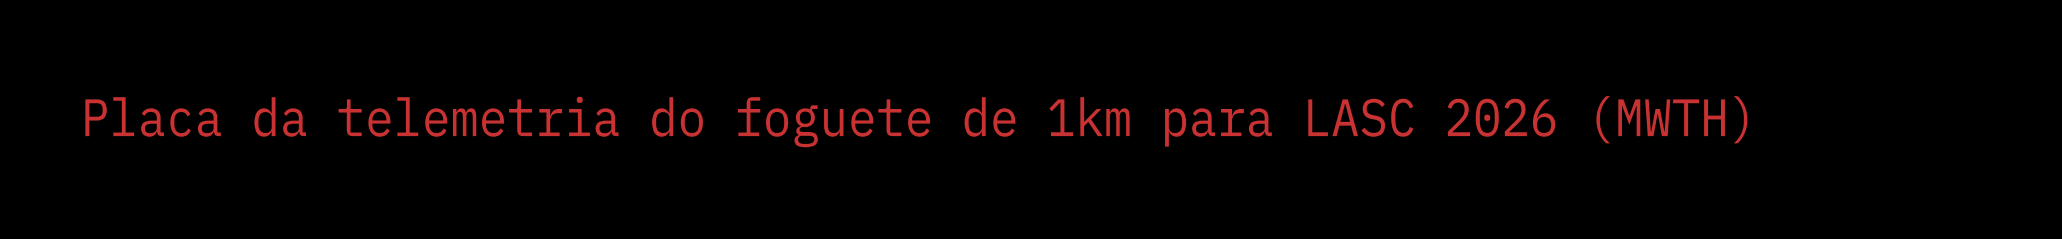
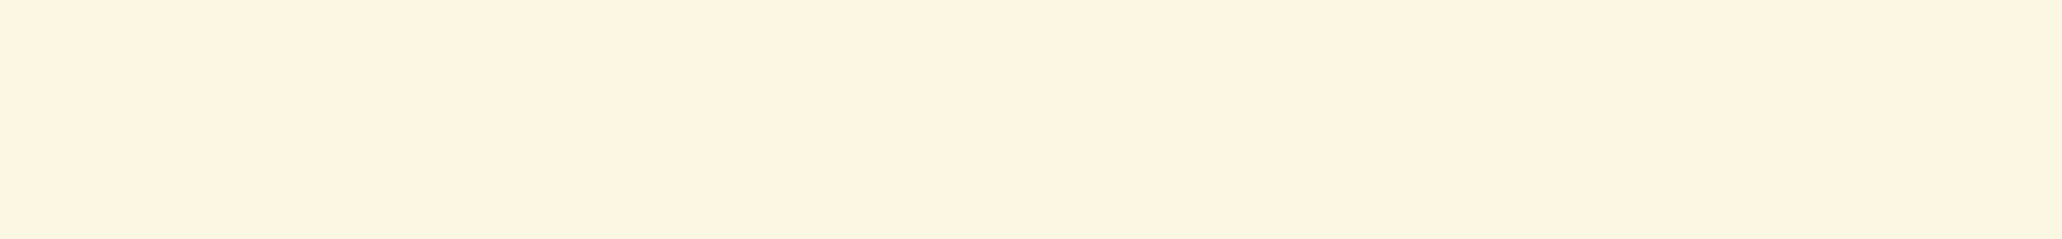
text: Placa da telemetria do foguete de 1km para LASC 2026 (MWTH) (916, 121) -> none

